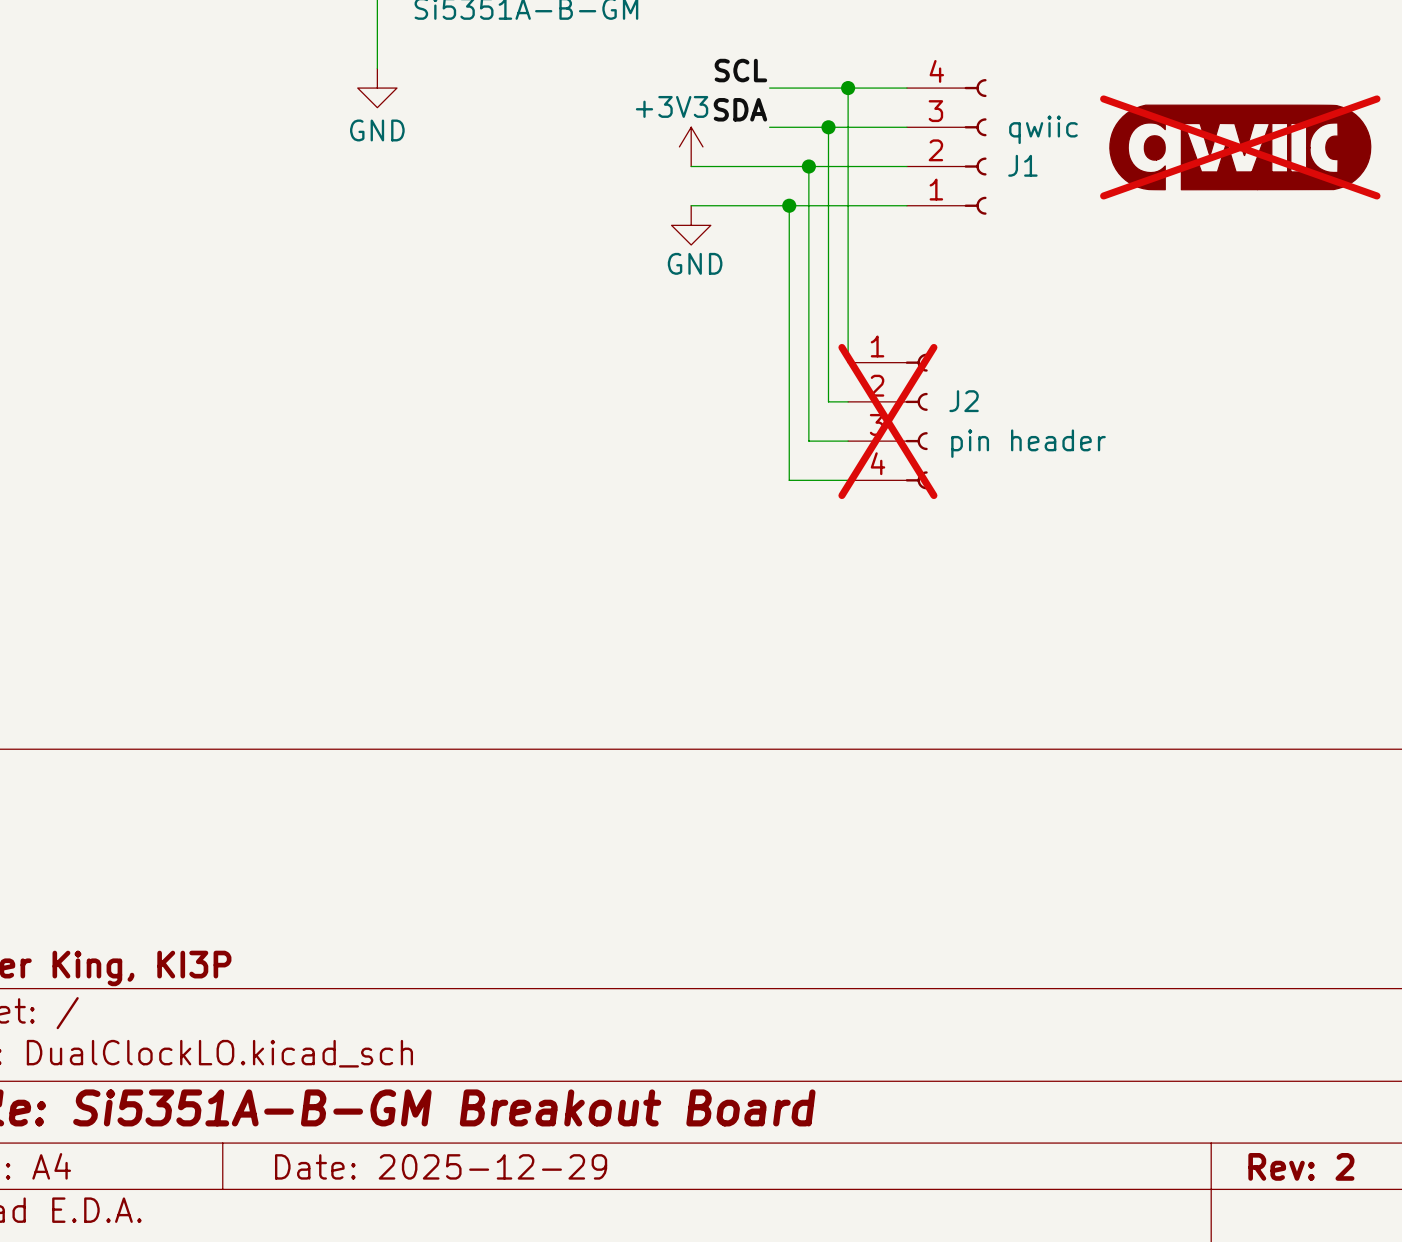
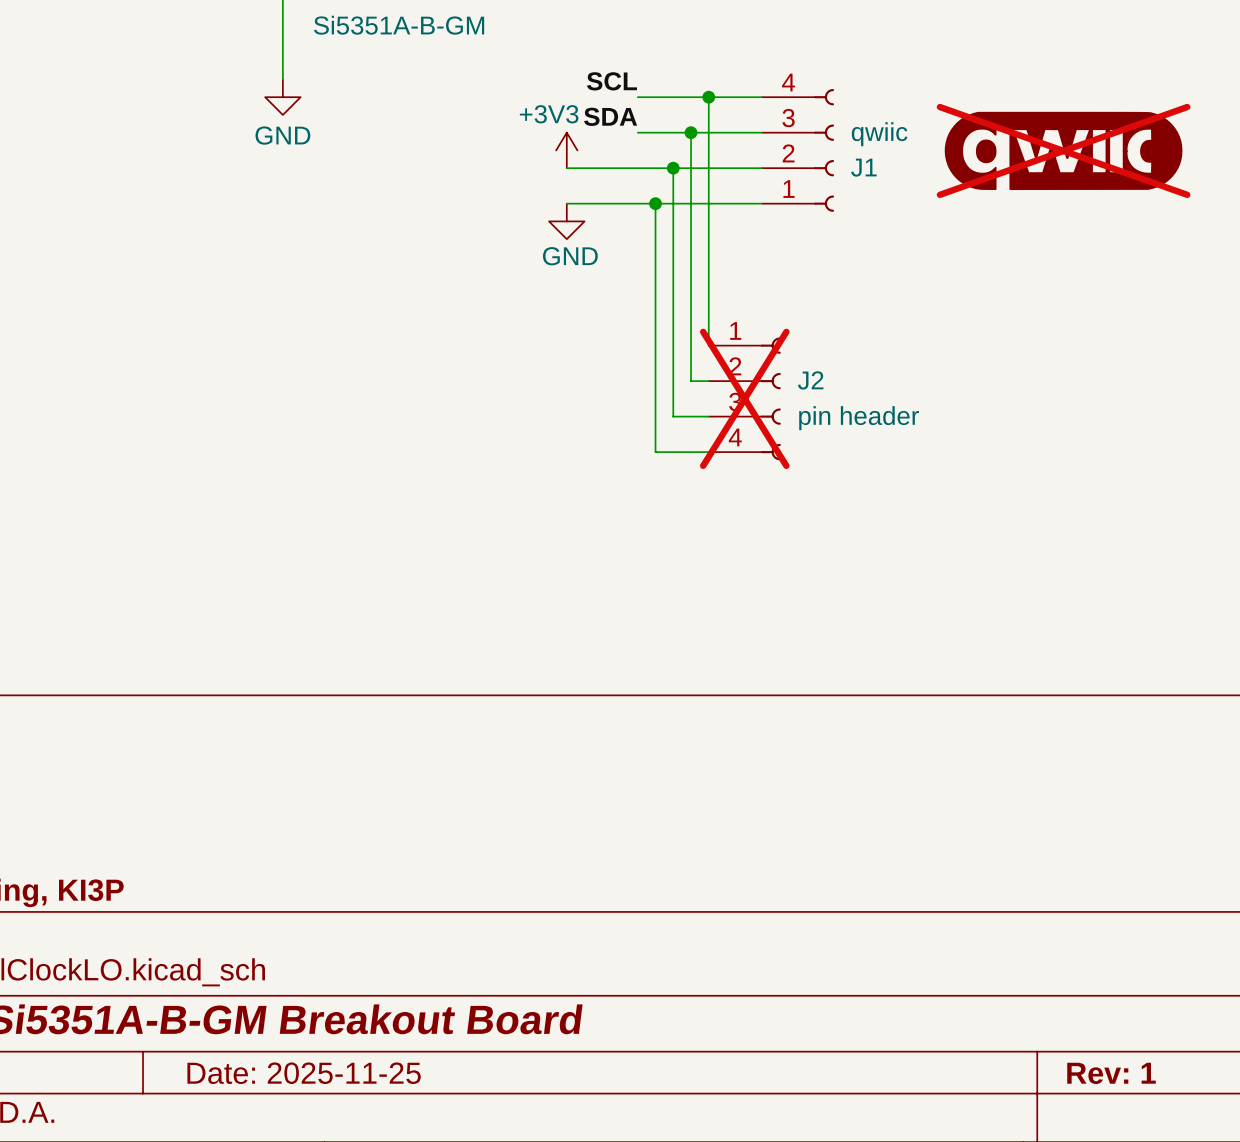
title block: Date: 2025-12-29 (441, 1166) -> Date: 2025-11-25 (304, 1073)
title block: Rev: 2 (1301, 1166) -> Rev: 1 (1111, 1073)

